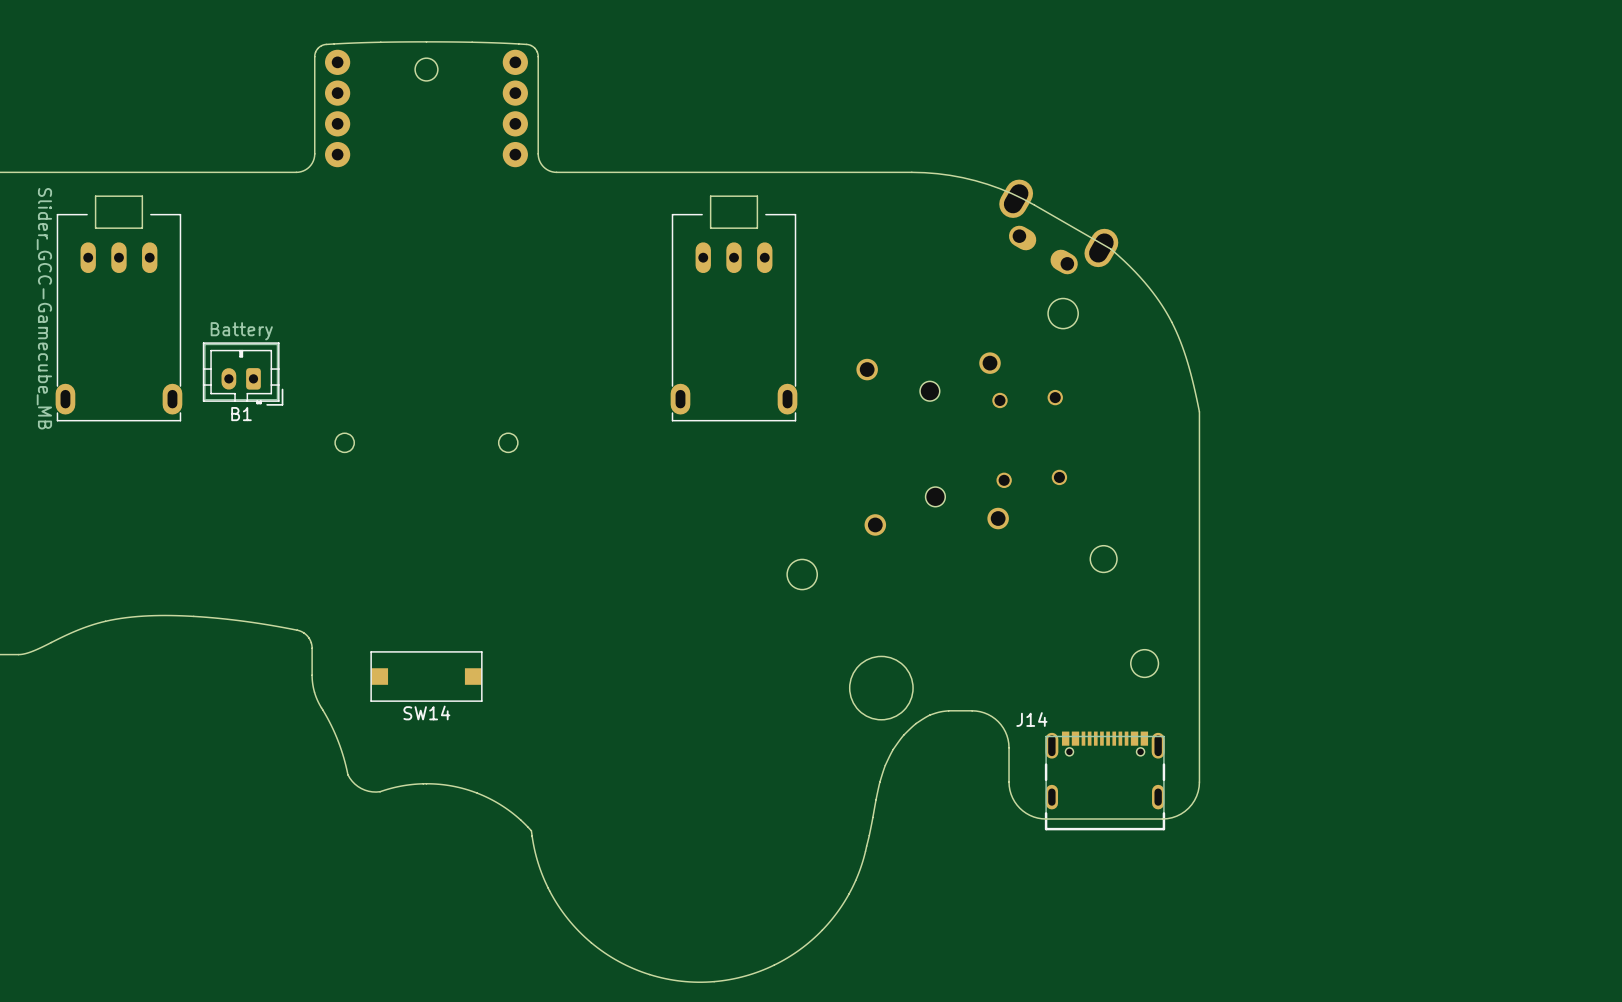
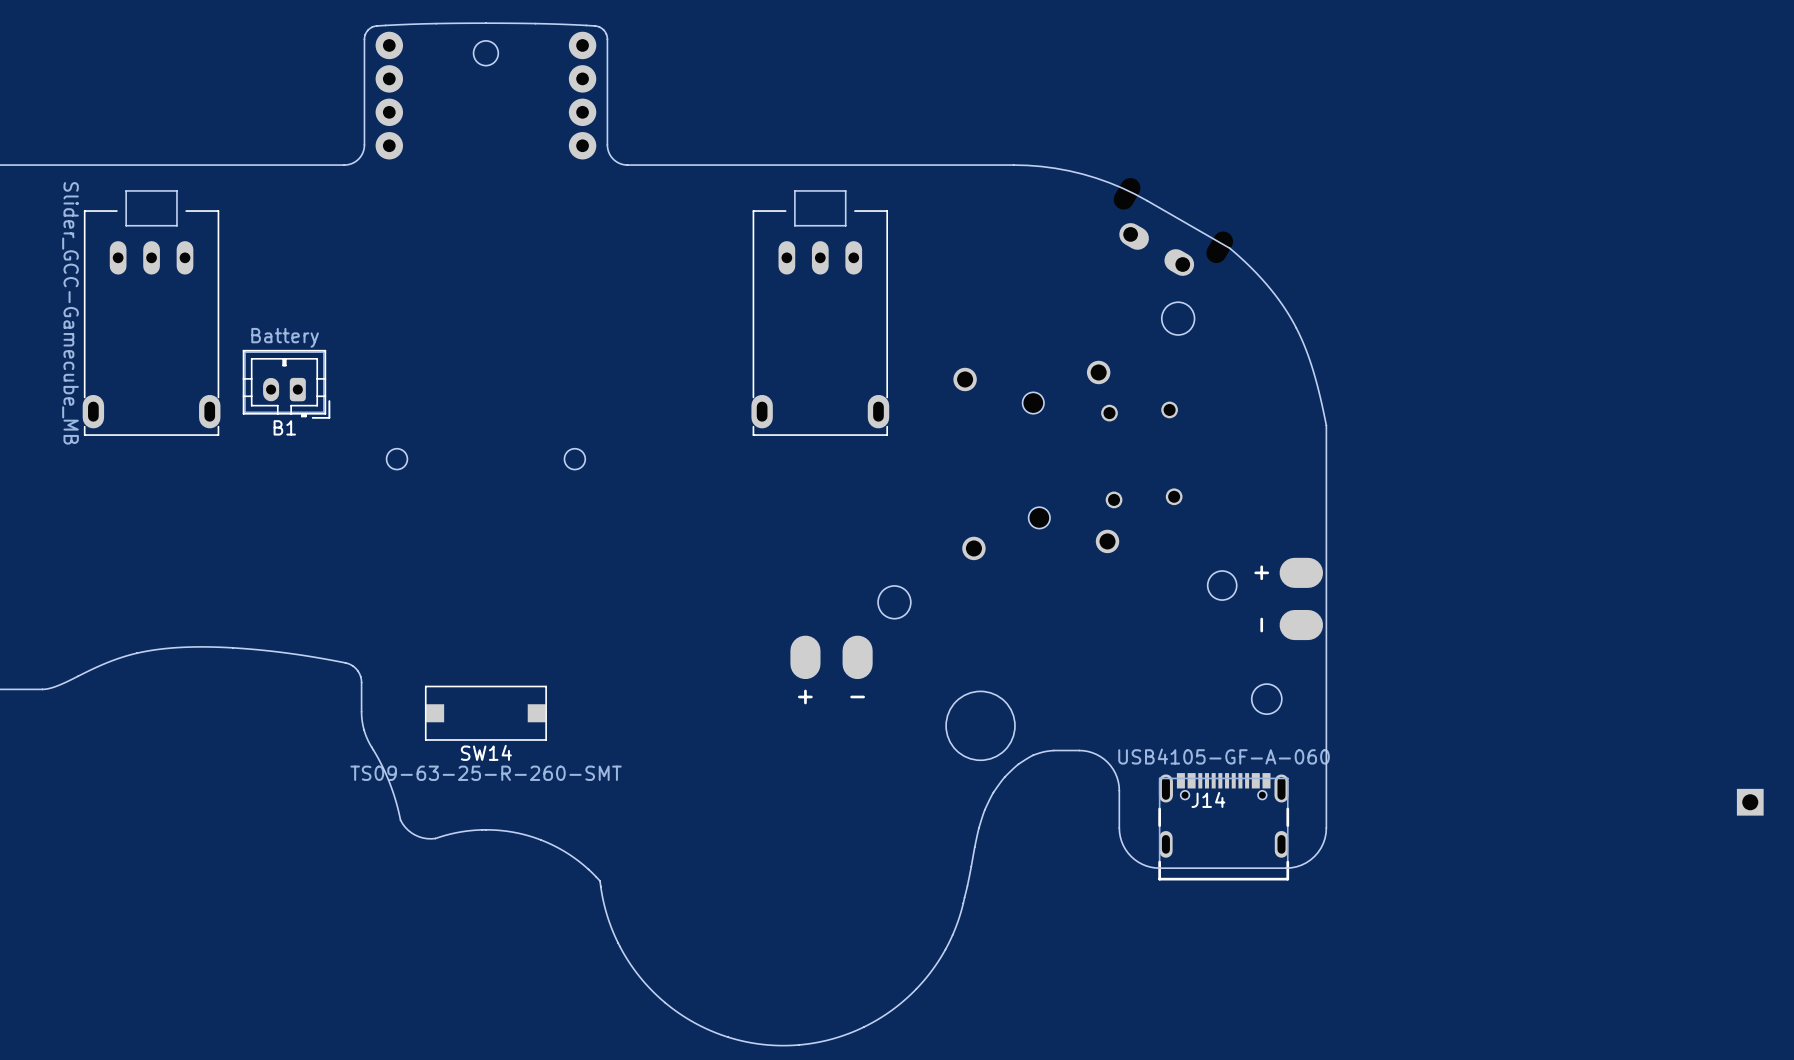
part footprint: [999, 179, 1119, 275] -> [1113, 177, 1234, 276]
part: none -> (1288, 598)
part: none -> (831, 669)
J14 value: none -> USB4105-GF-A-060 (1224, 756)
J14 name position: J14 (1031, 719) -> J14 (1208, 799)
SW14 value: none -> TS09-63-25-R-260-SMT (486, 773)
part: none -> (1750, 802)

